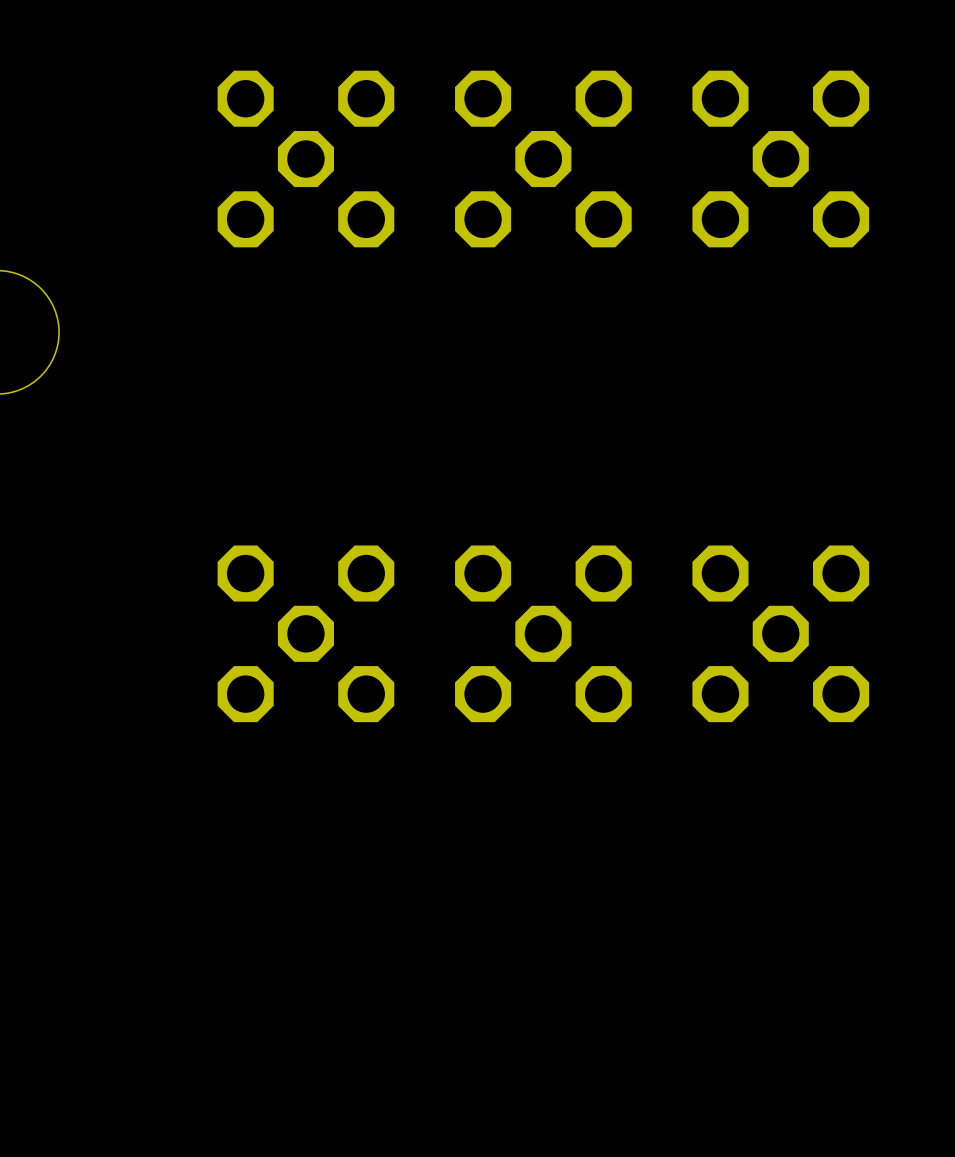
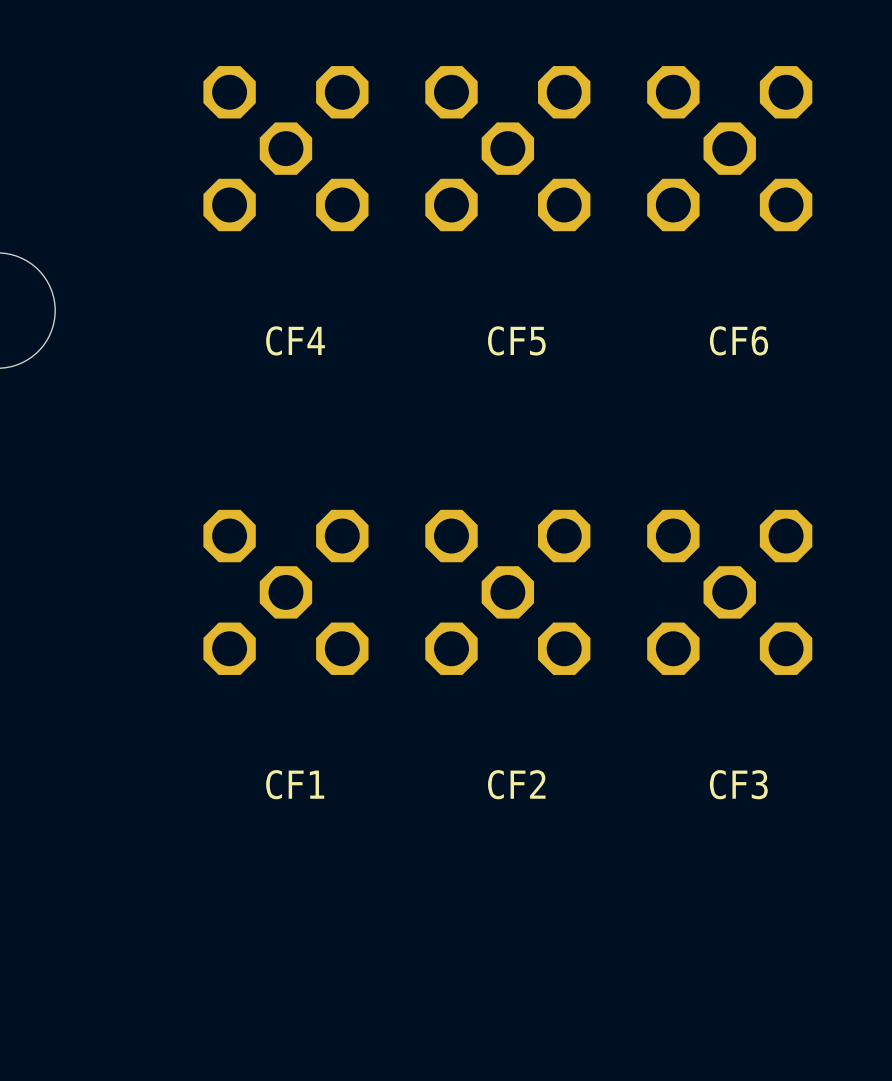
CF4 name: none -> CF4 (295, 340)
CF5 name: none -> CF5 (516, 340)
CF6 name: none -> CF6 (739, 340)
CF1 name: none -> CF1 (295, 784)
CF2 name: none -> CF2 (516, 784)
CF3 name: none -> CF3 (738, 784)

